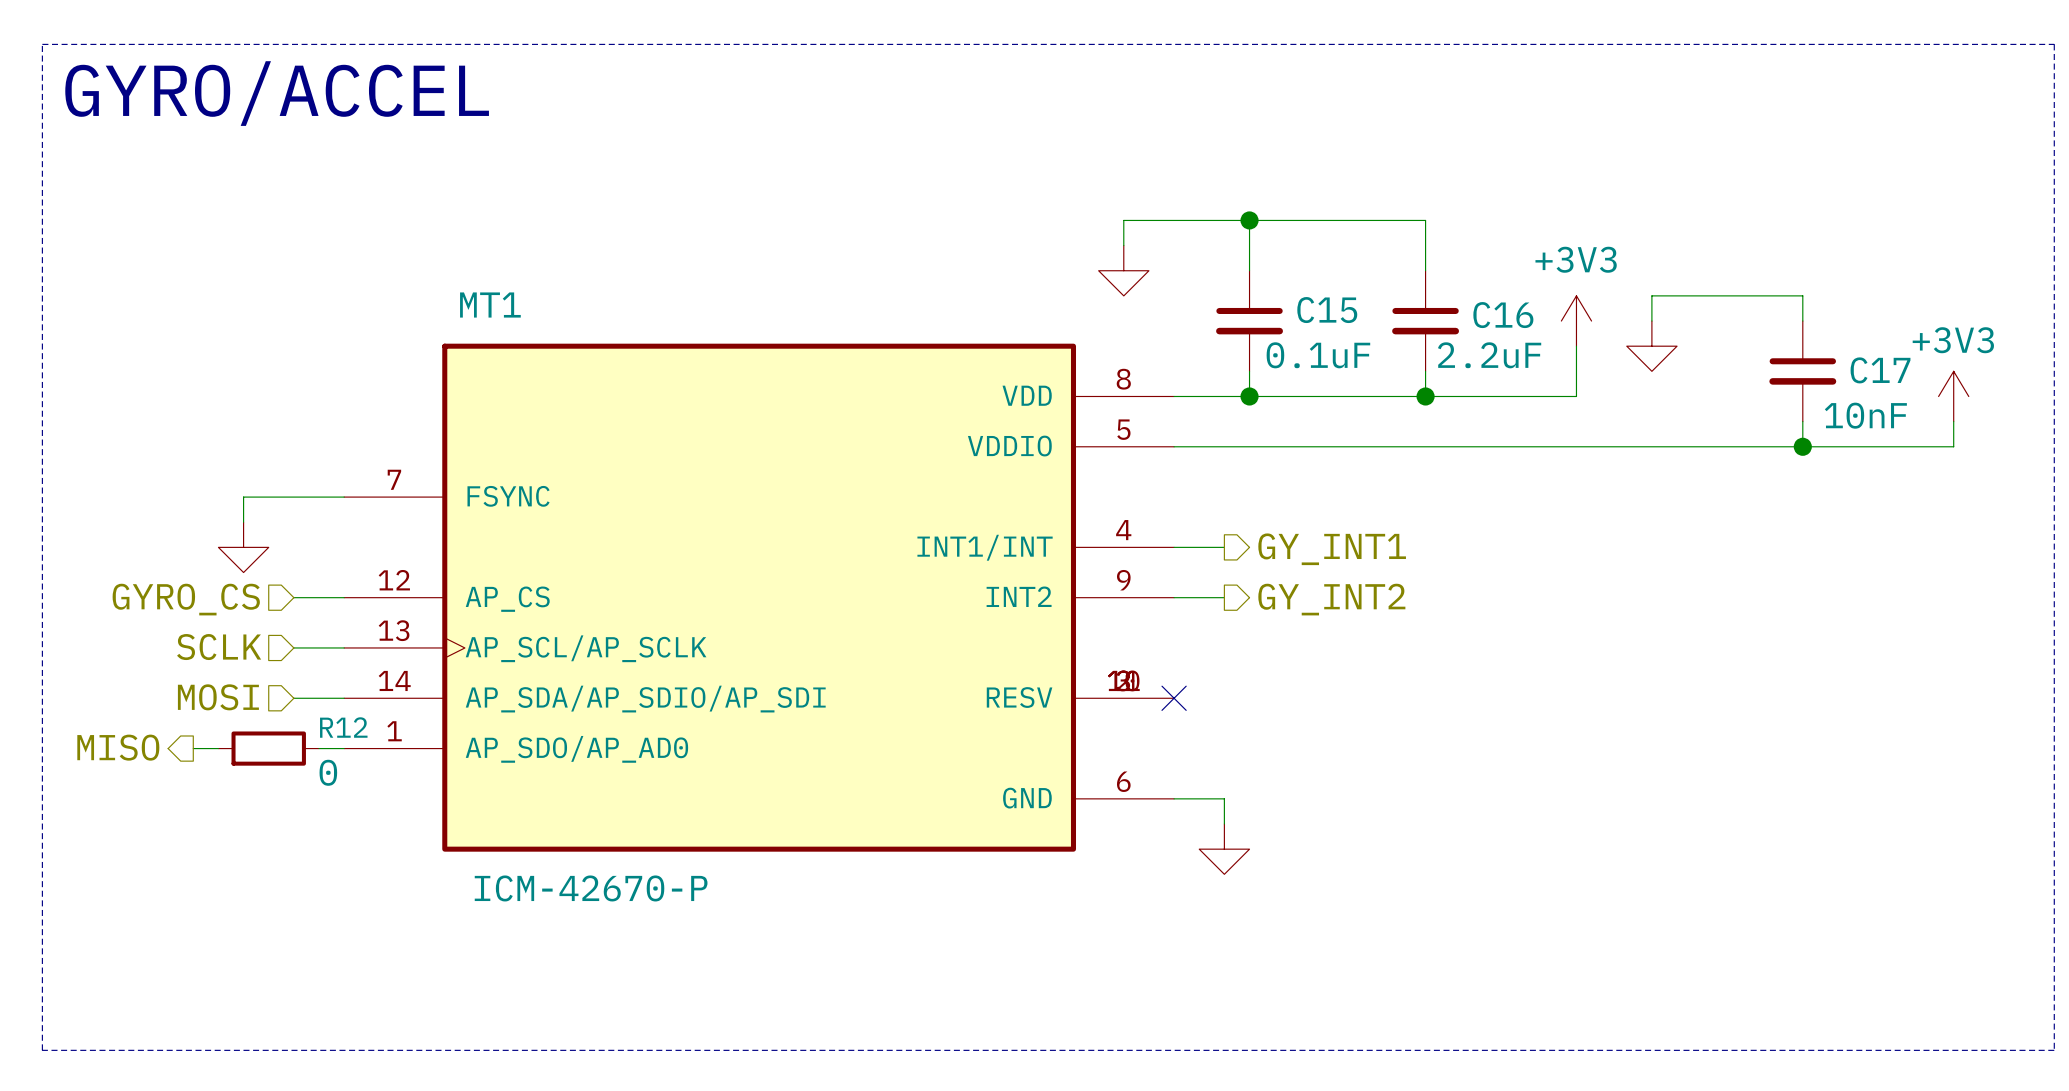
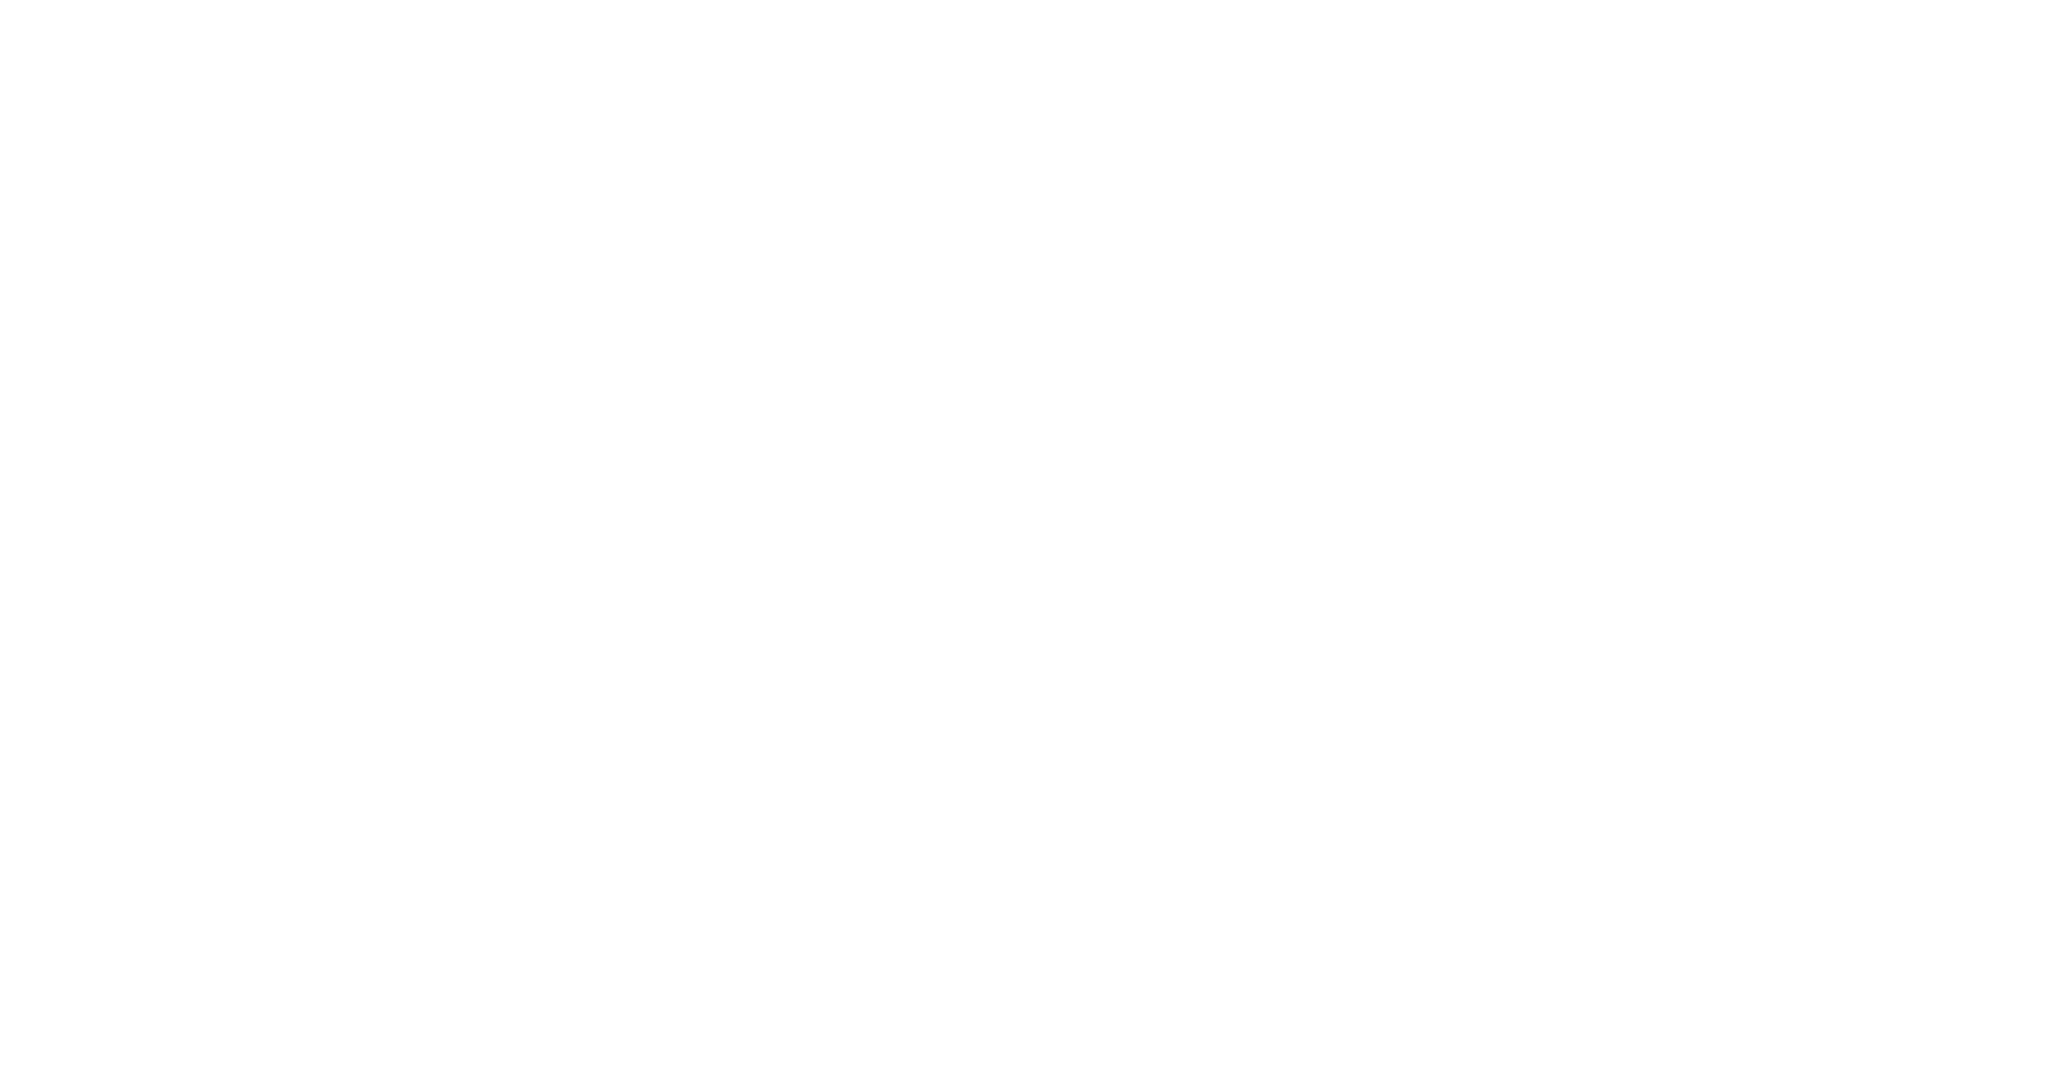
line: (42, 44) (2054, 44) (2054, 1050) (42, 1050) (42, 44) -> none
text: GYRO/ACCEL (277, 93) -> none
wire: (1249, 220) (1249, 270) -> none
junction: (1249, 220) -> none
wire: (1123, 245) (1123, 220) (1425, 220) (1425, 270) -> none
power symbol: (1123, 270) -> none
C15: 0.1uF (1249, 321) -> none
C16: 2.2uF (1425, 321) -> none
power symbol: +3V3 (1576, 321) -> none
wire: (1651, 321) (1651, 295) (1802, 295) (1802, 321) -> none
wire: (1576, 346) (1576, 396) (1174, 396) -> none
power symbol: (1651, 346) -> none
wire: (1249, 371) (1249, 396) -> none
wire: (1425, 371) (1425, 396) -> none
C17: 10nF (1802, 371) -> none
junction: (1249, 396) -> none
junction: (1425, 396) -> none
power symbol: +3V3 (1953, 396) -> none
wire: (1802, 421) (1802, 446) -> none
wire: (1953, 421) (1953, 446) (1174, 446) -> none
junction: (1802, 446) -> none
wire: (344, 497) (243, 497) (243, 522) -> none
power symbol: (243, 547) -> none
wire: (1174, 547) (1224, 547) -> none
hierarchical label: GY_INT1 (1332, 549) -> none
wire: (293, 597) (344, 597) -> none
MT1: ICM-42670-P (759, 597) -> none
wire: (1174, 597) (1224, 597) -> none
hierarchical label: GYRO_CS (186, 599) -> none
hierarchical label: GY_INT2 (1331, 599) -> none
hierarchical label: SCLK (219, 647) -> none
wire: (293, 647) (344, 647) -> none
hierarchical label: MOSI (218, 697) -> none
wire: (293, 698) (344, 698) -> none
no-connect mark: (1174, 698) -> none
hierarchical label: MISO (118, 747) -> none
wire: (193, 748) (218, 748) -> none
R12: 0 (268, 748) -> none
wire: (319, 748) (344, 748) -> none
wire: (1174, 798) (1224, 798) (1224, 824) -> none
power symbol: (1224, 849) -> none

